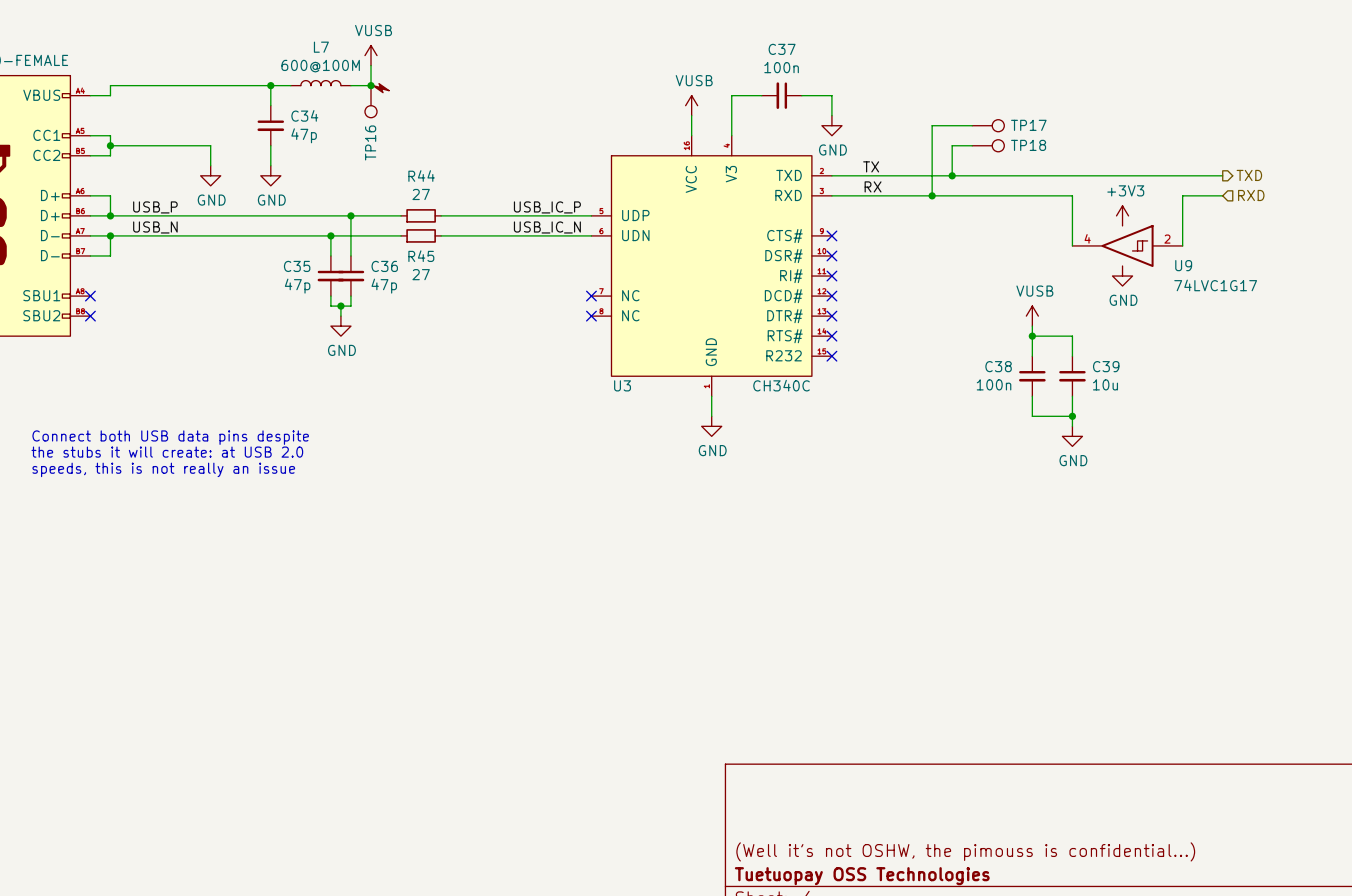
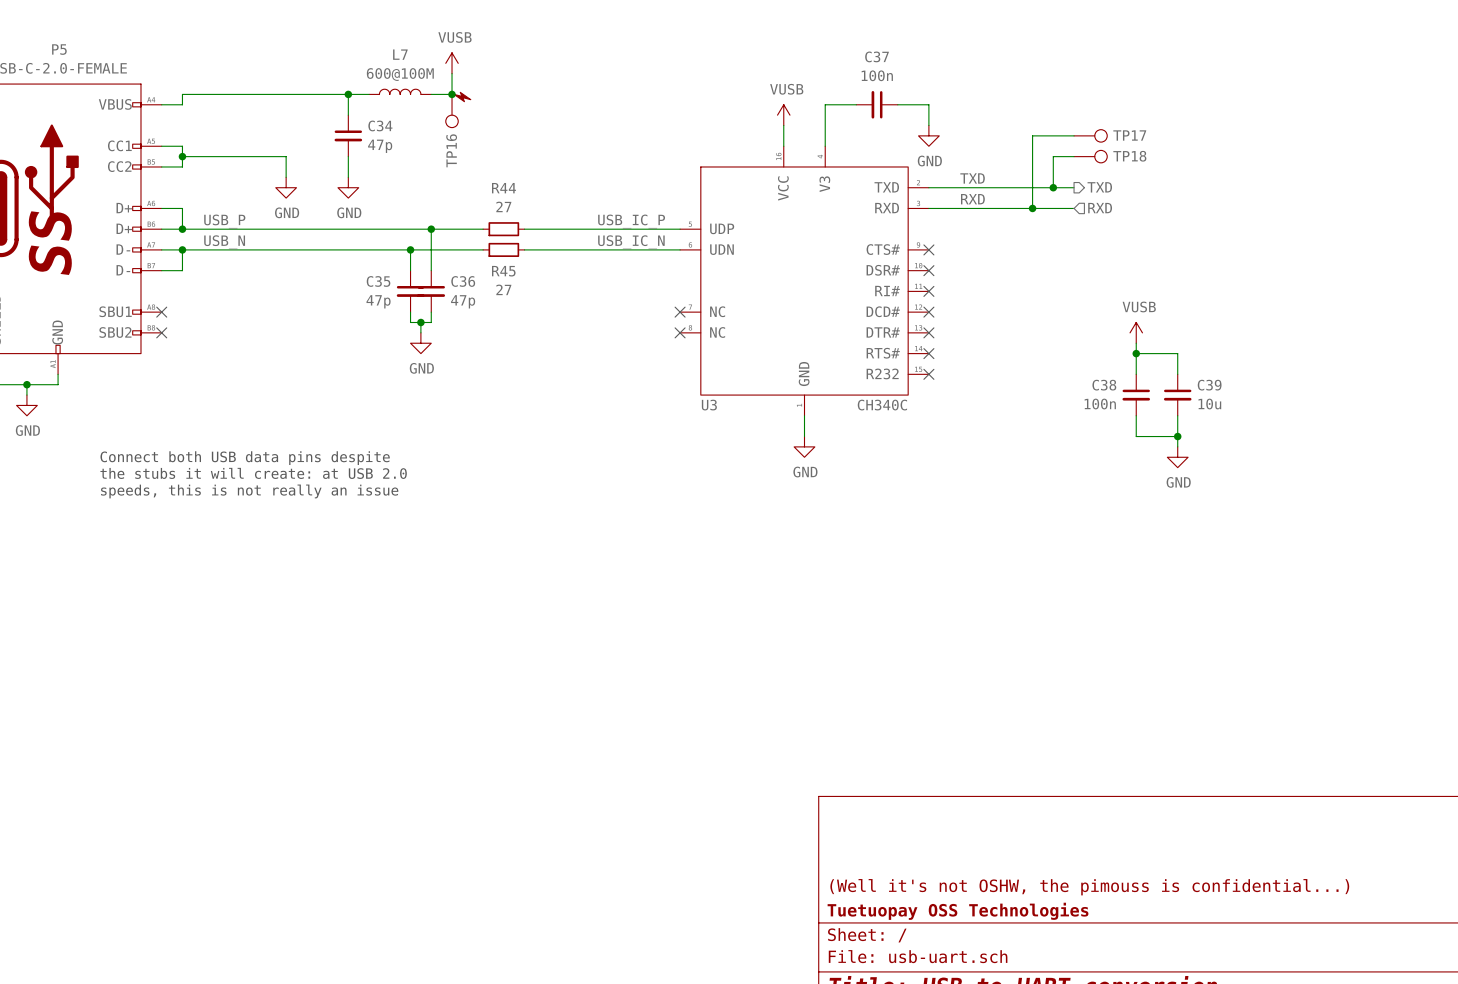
label: TX (871, 166) -> TXD (972, 178)
wire: (972, 175) (1222, 175) -> none
hierarchical label: none -> TXD (1099, 187)
hierarchical label: TXD (1249, 175) -> none
label: RX (873, 186) -> RXD (972, 199)
wire: (972, 195) (1072, 195) (1072, 245) -> none
hierarchical label: none -> RXD (1100, 208)
wire: (1222, 195) (1182, 195) (1182, 245) -> none
hierarchical label: RXD (1251, 195) -> none
power symbol: +3V3 (1122, 215) -> none
U9: 74LVC1G17 (1127, 245) -> none
power symbol: GND (1122, 276) -> none

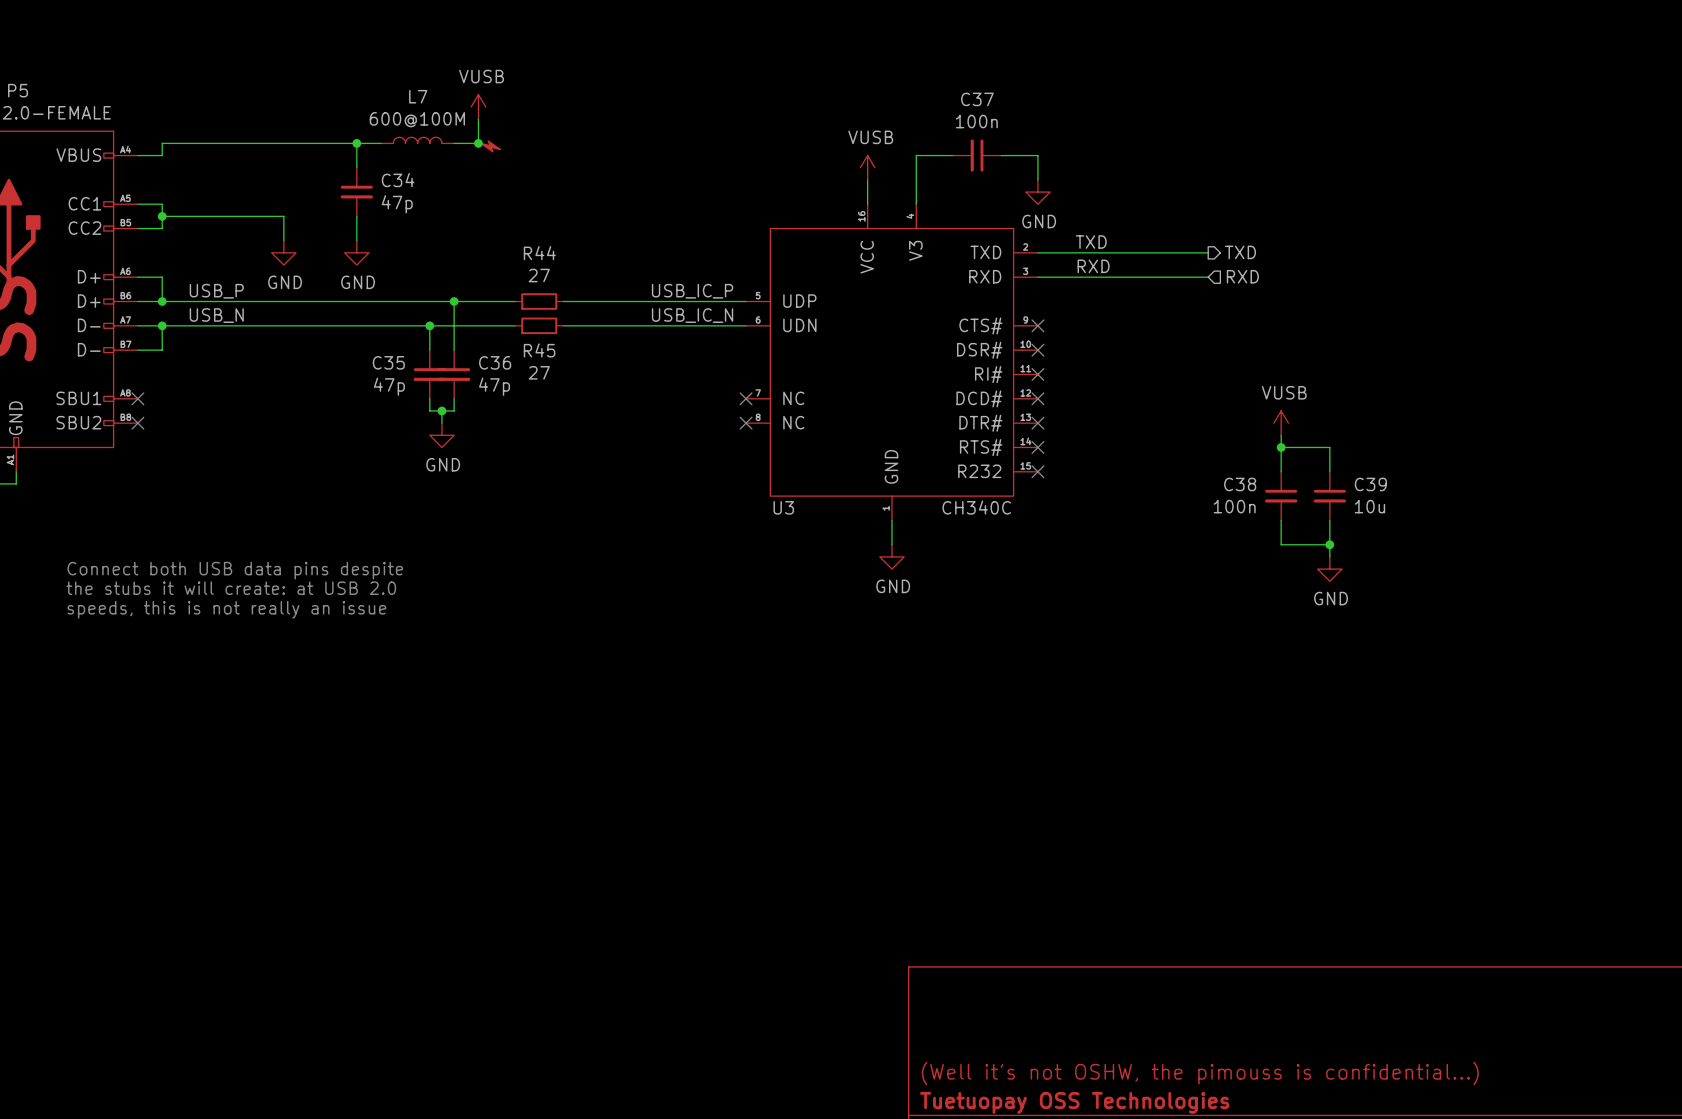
TP16: (452, 111) -> none
wire: (1074, 135) (1032, 135) (1032, 208) -> none
TP17: (1090, 135) -> none
wire: (1074, 156) (1053, 156) (1053, 187) -> none
TP18: (1090, 156) -> none
junction: (1053, 187) -> none
junction: (1032, 208) -> none

